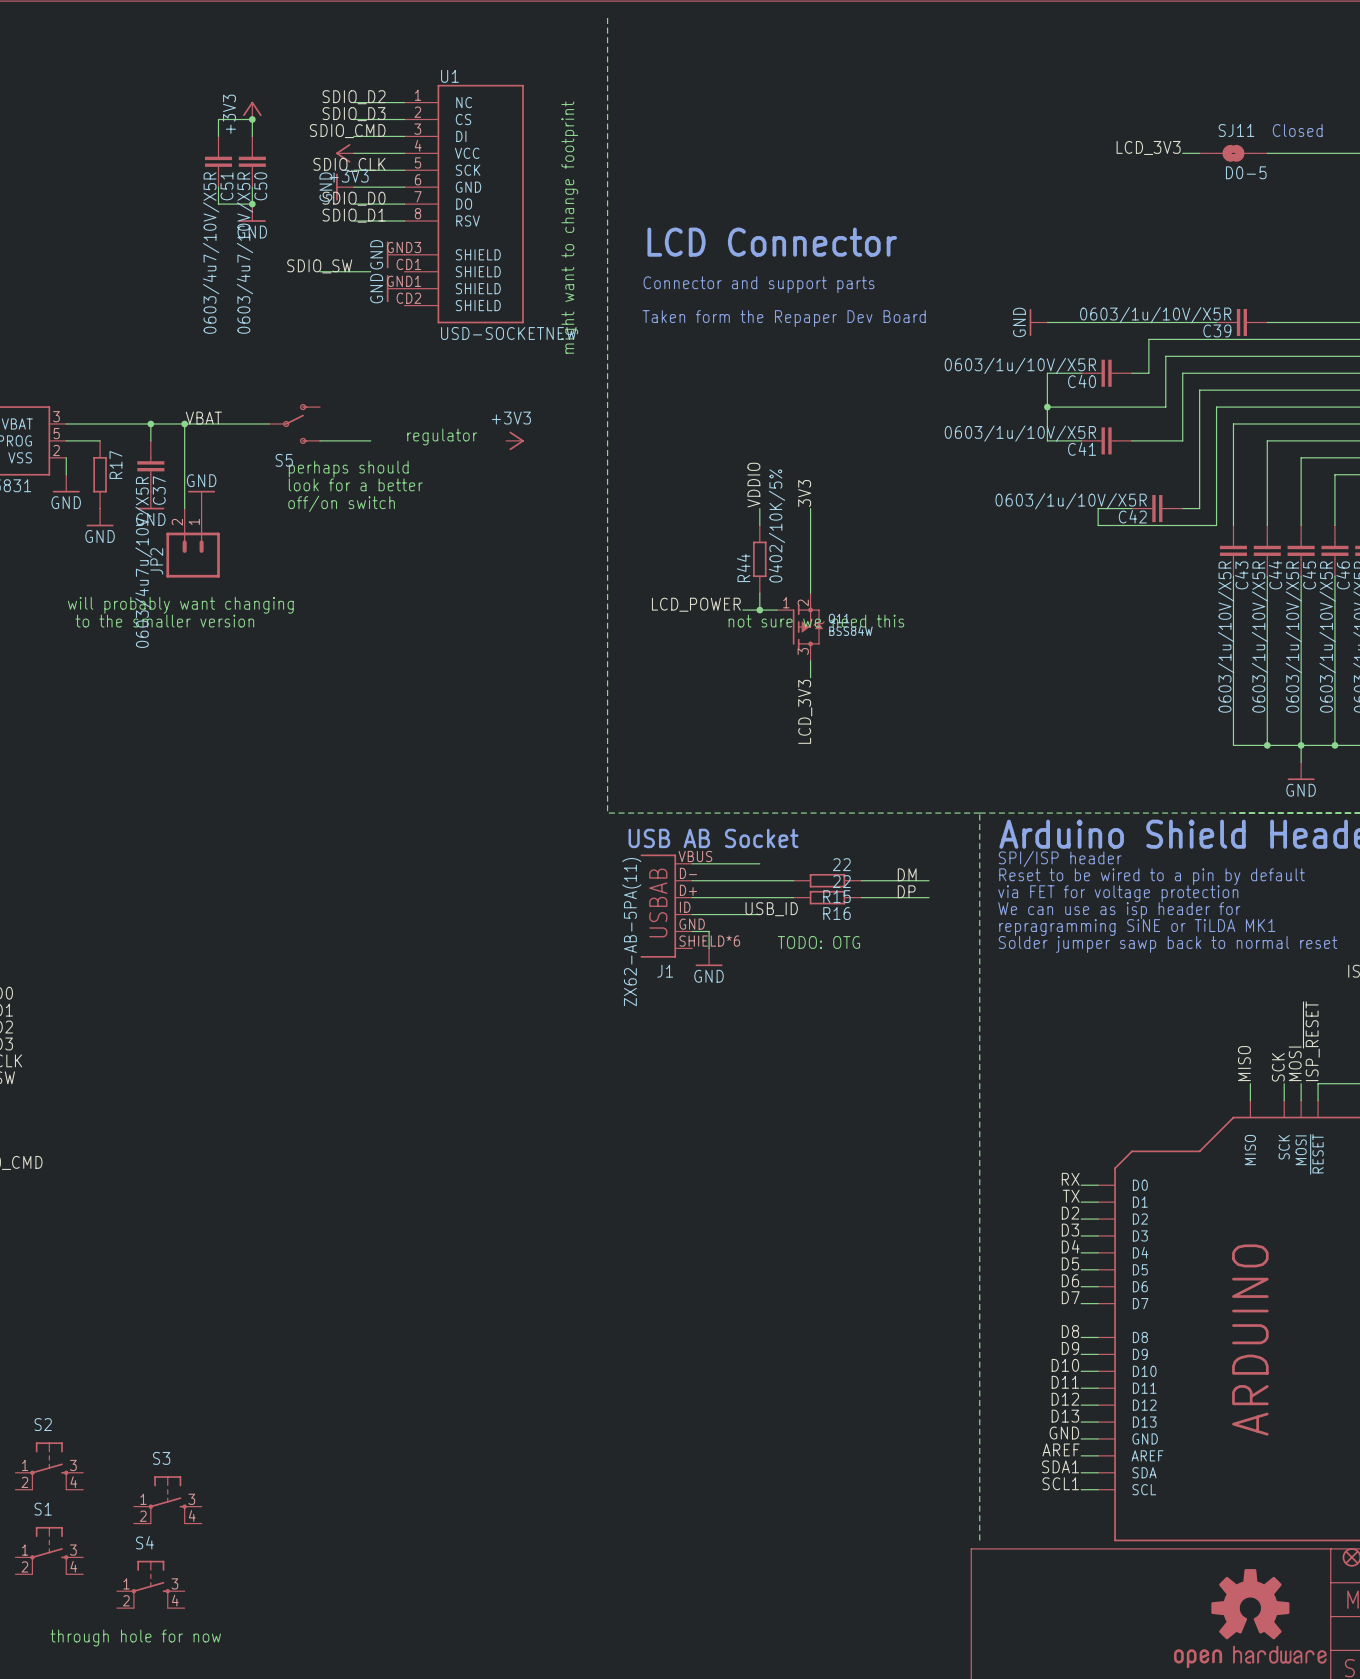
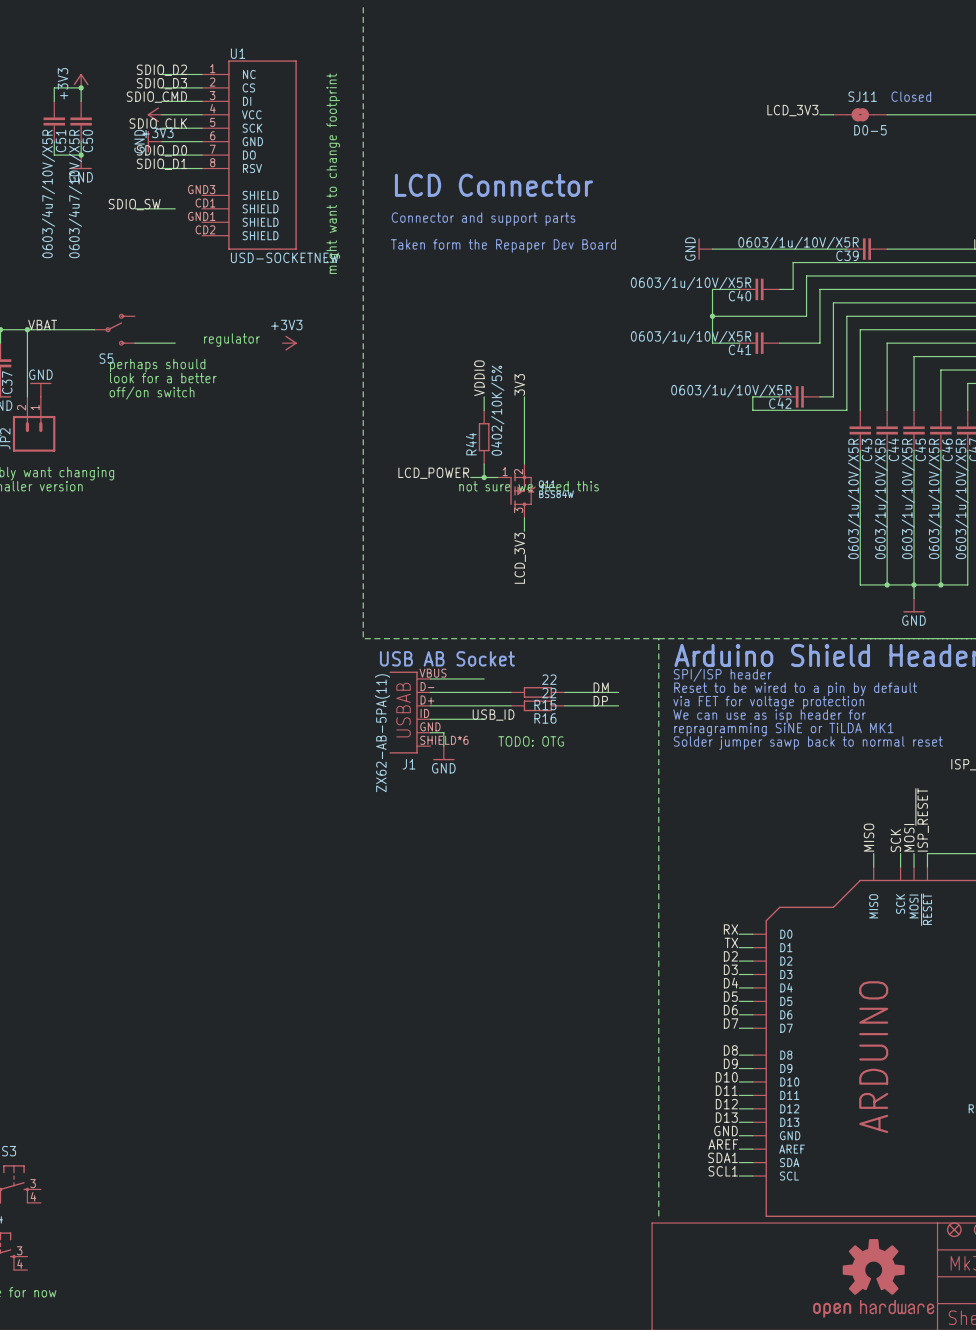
power symbol: GND (395, 254) -> none
power symbol: GND (395, 288) -> none

